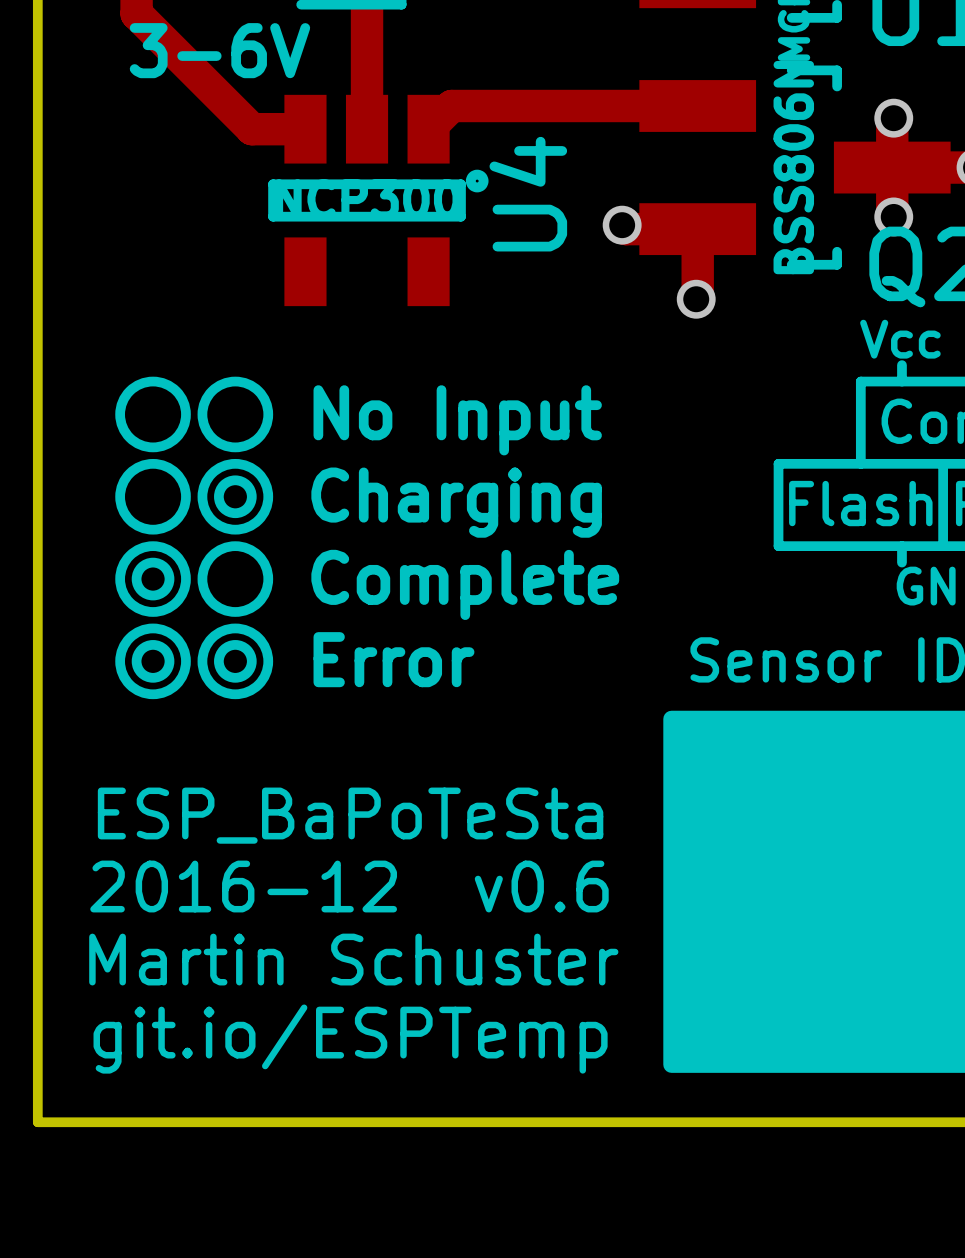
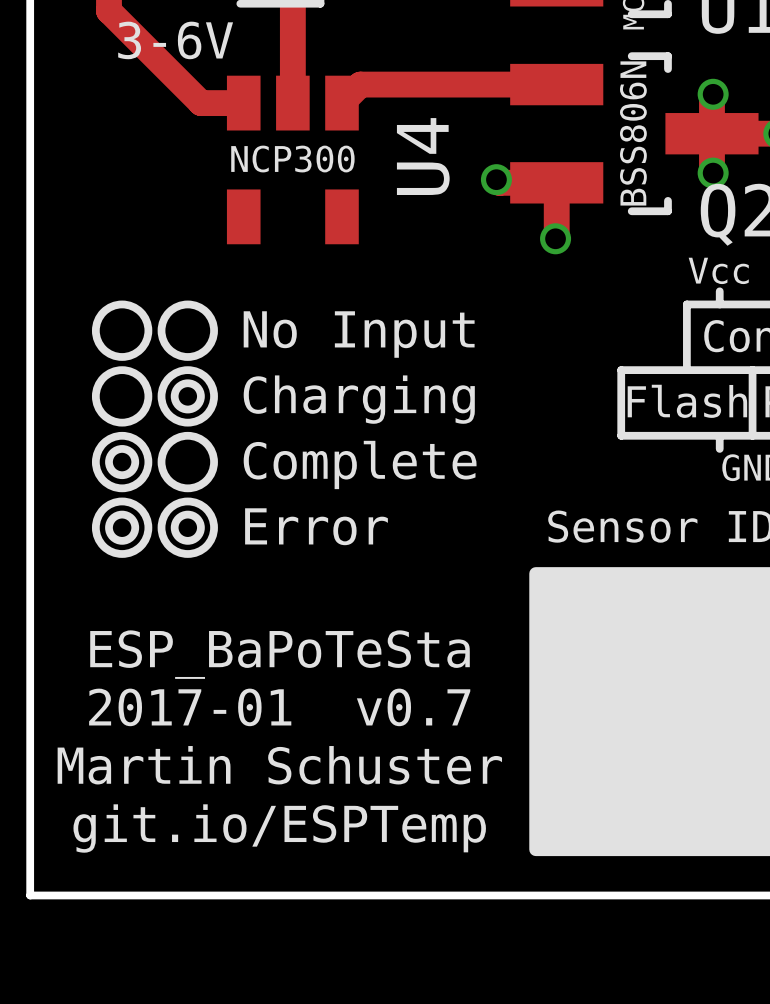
U4 footprint: [268, 94, 489, 307] -> [226, 75, 359, 245]
text: 2016-12 v0.6 (349, 886) -> 2017-01 v0.7 (279, 707)

